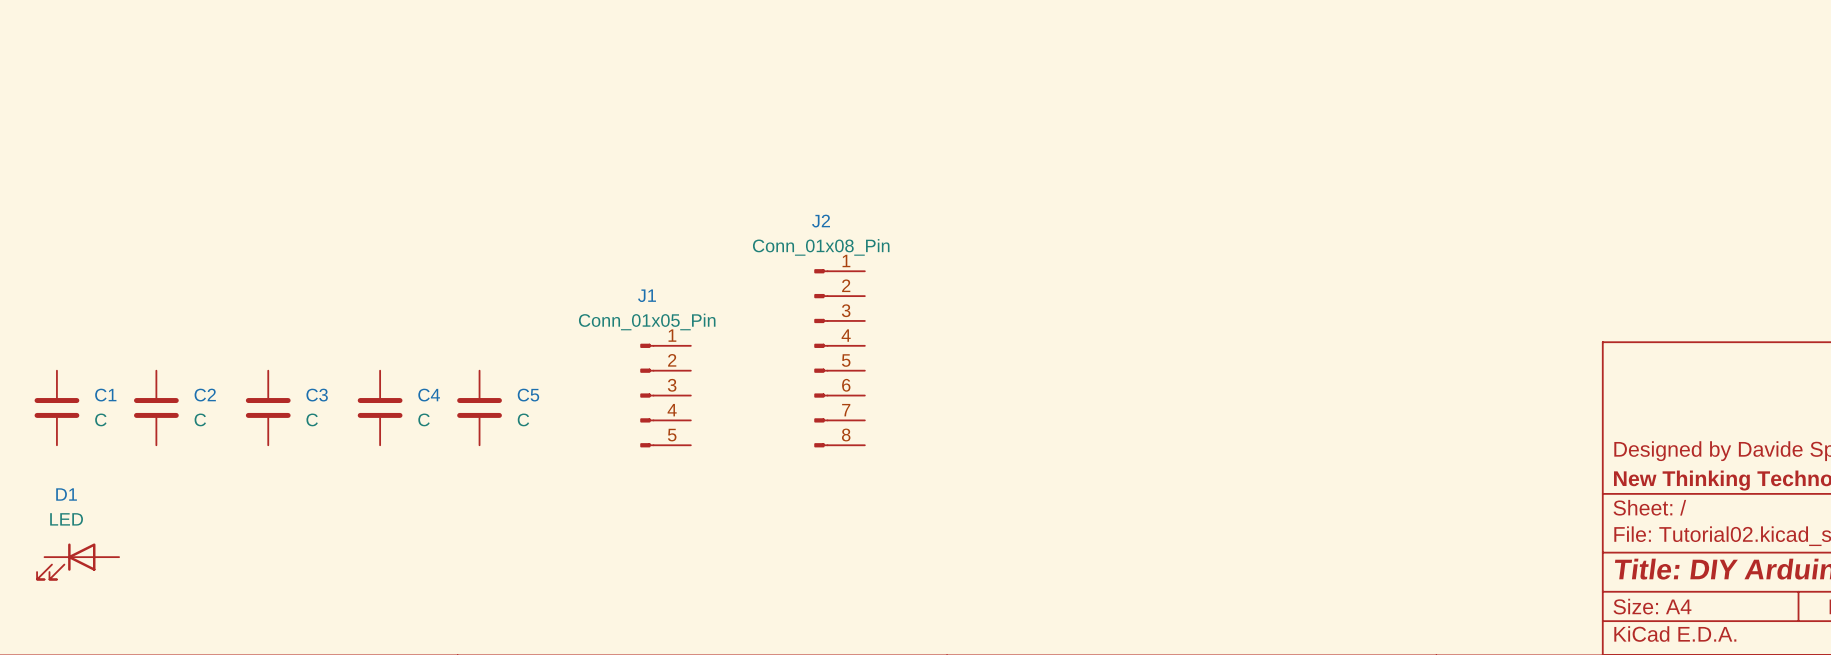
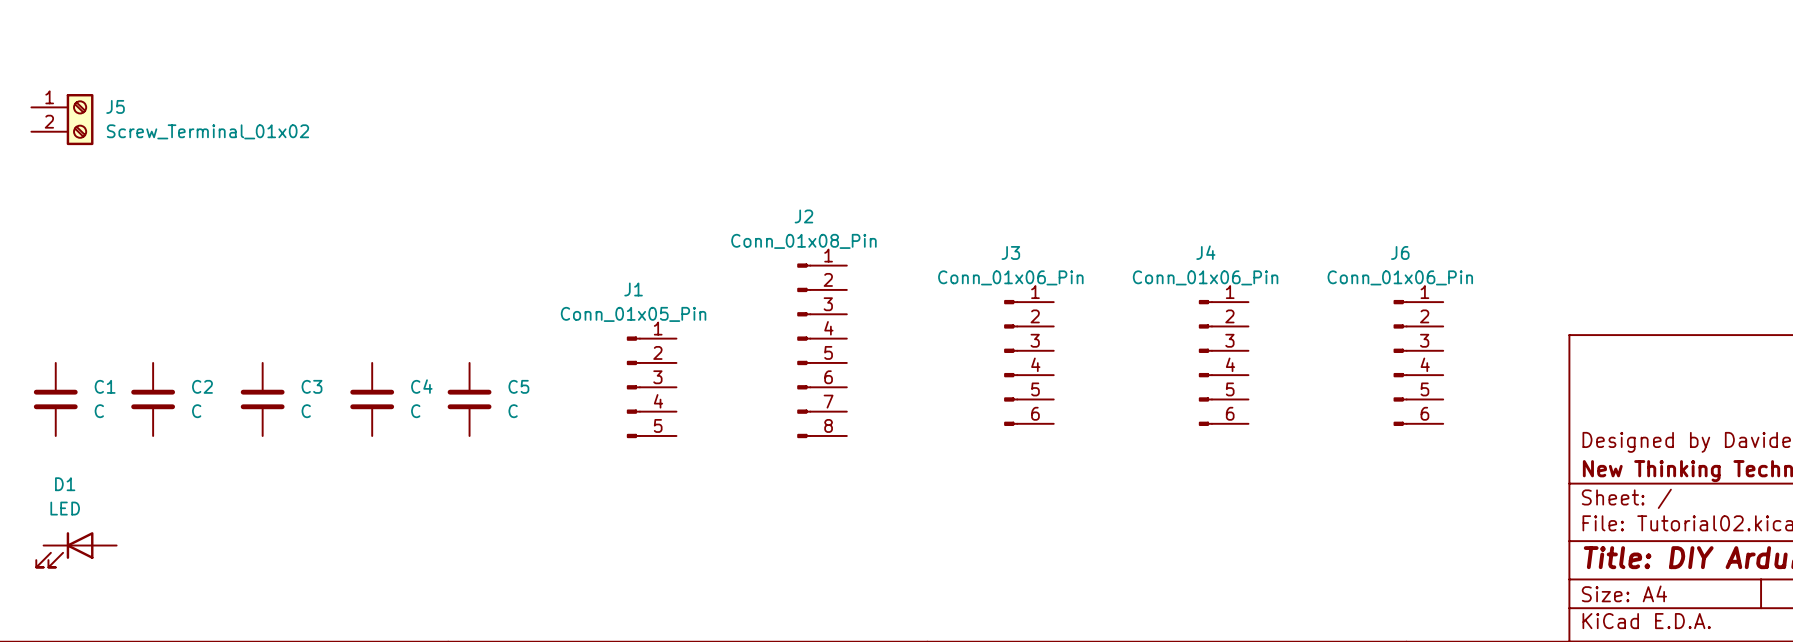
J5: none -> Screw_Terminal_01x02 (62, 119)
J3: none -> Conn_01x06_Pin (1029, 362)
J4: none -> Conn_01x06_Pin (1223, 362)
J6: none -> Conn_01x06_Pin (1418, 362)

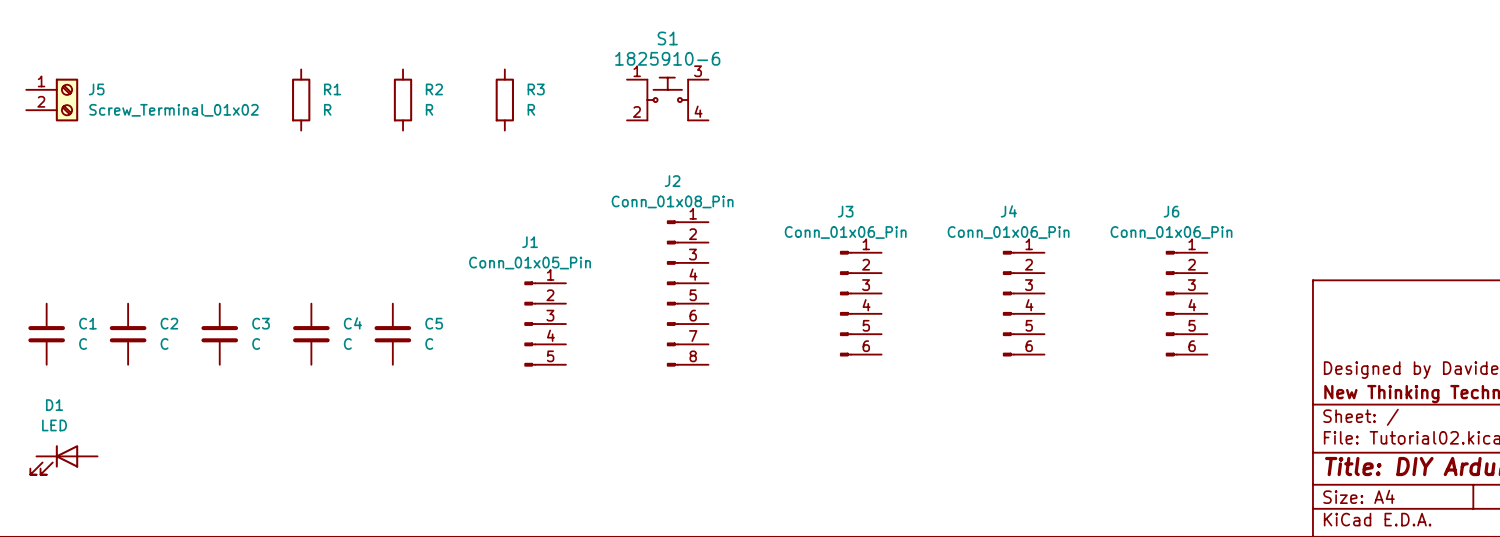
S1: none -> 1825910-6 (667, 99)
R1: none -> R (301, 100)
R2: none -> R (403, 100)
R3: none -> R (504, 100)

